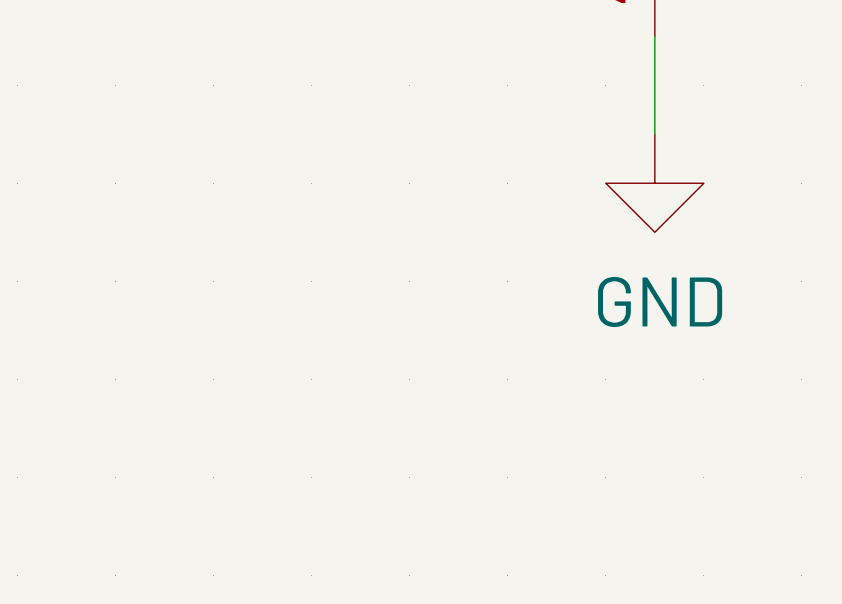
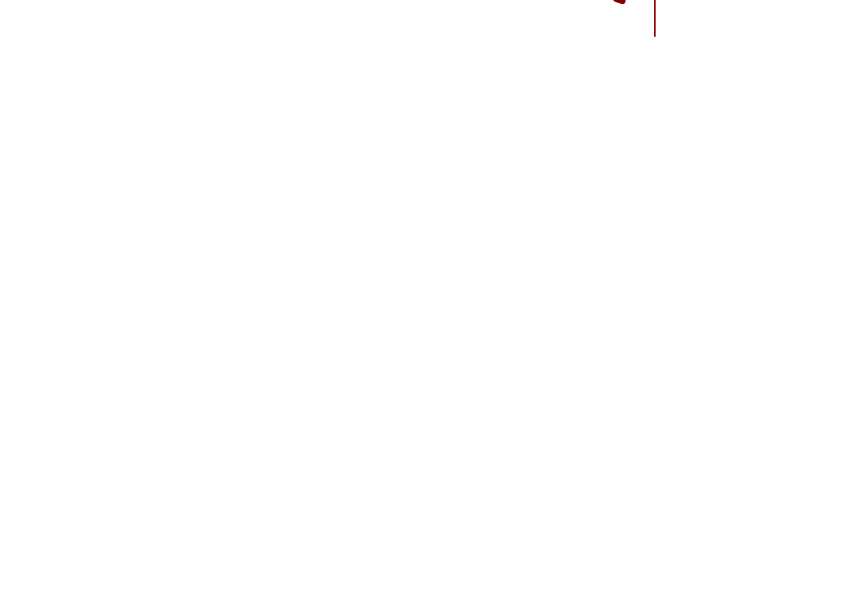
wire: (654, 36) (654, 134) -> none
power symbol: GND (654, 183) -> none

